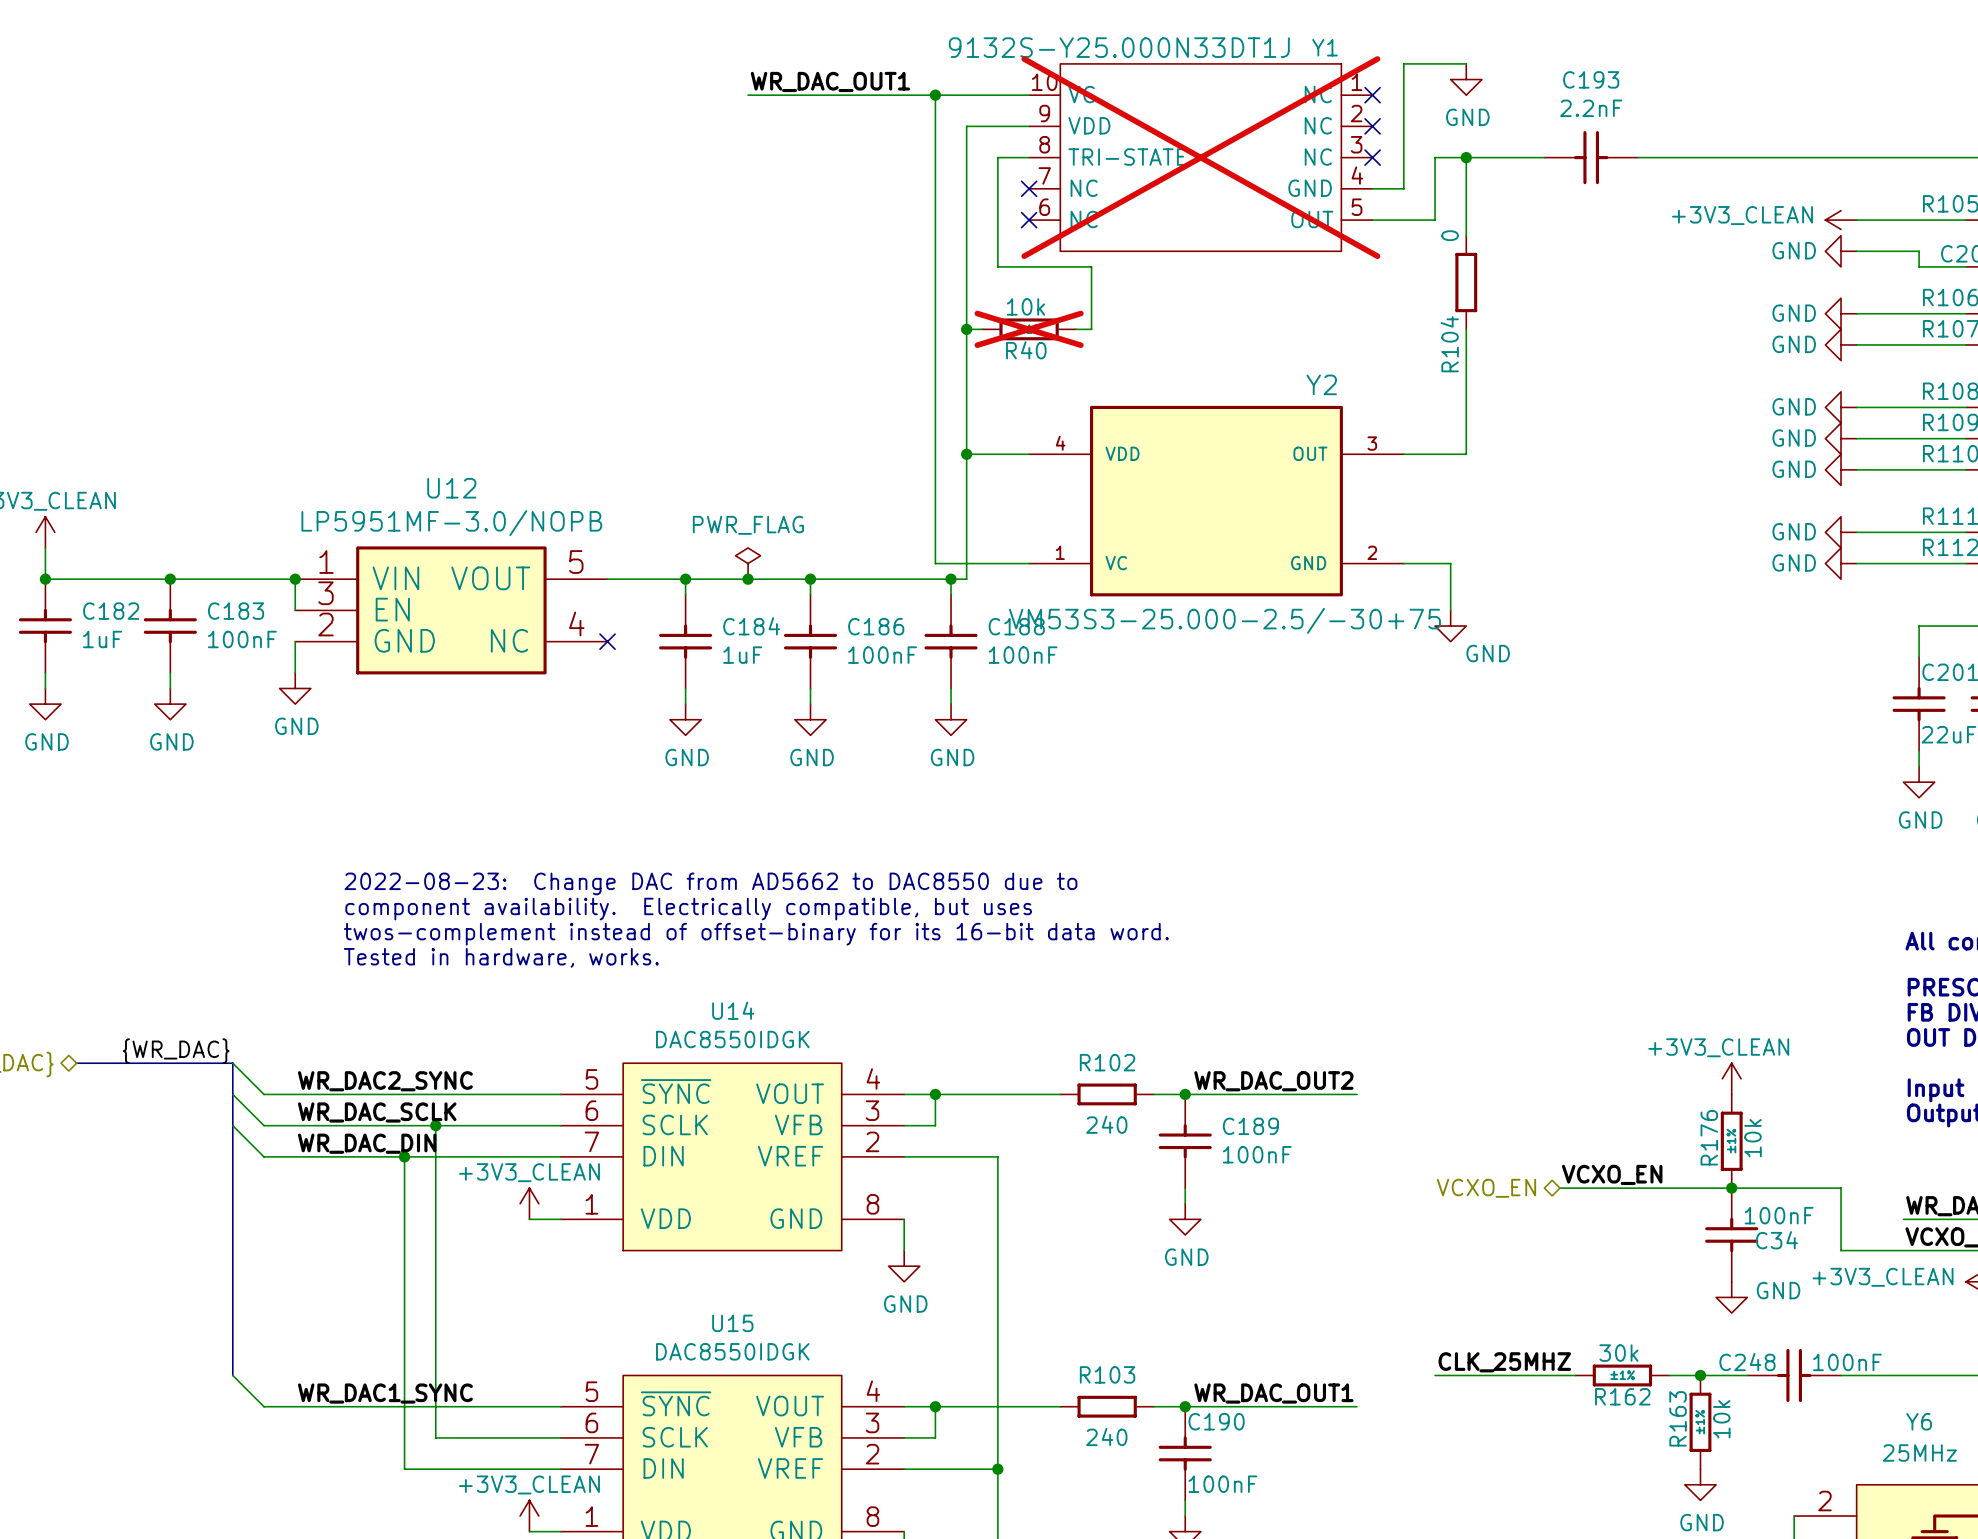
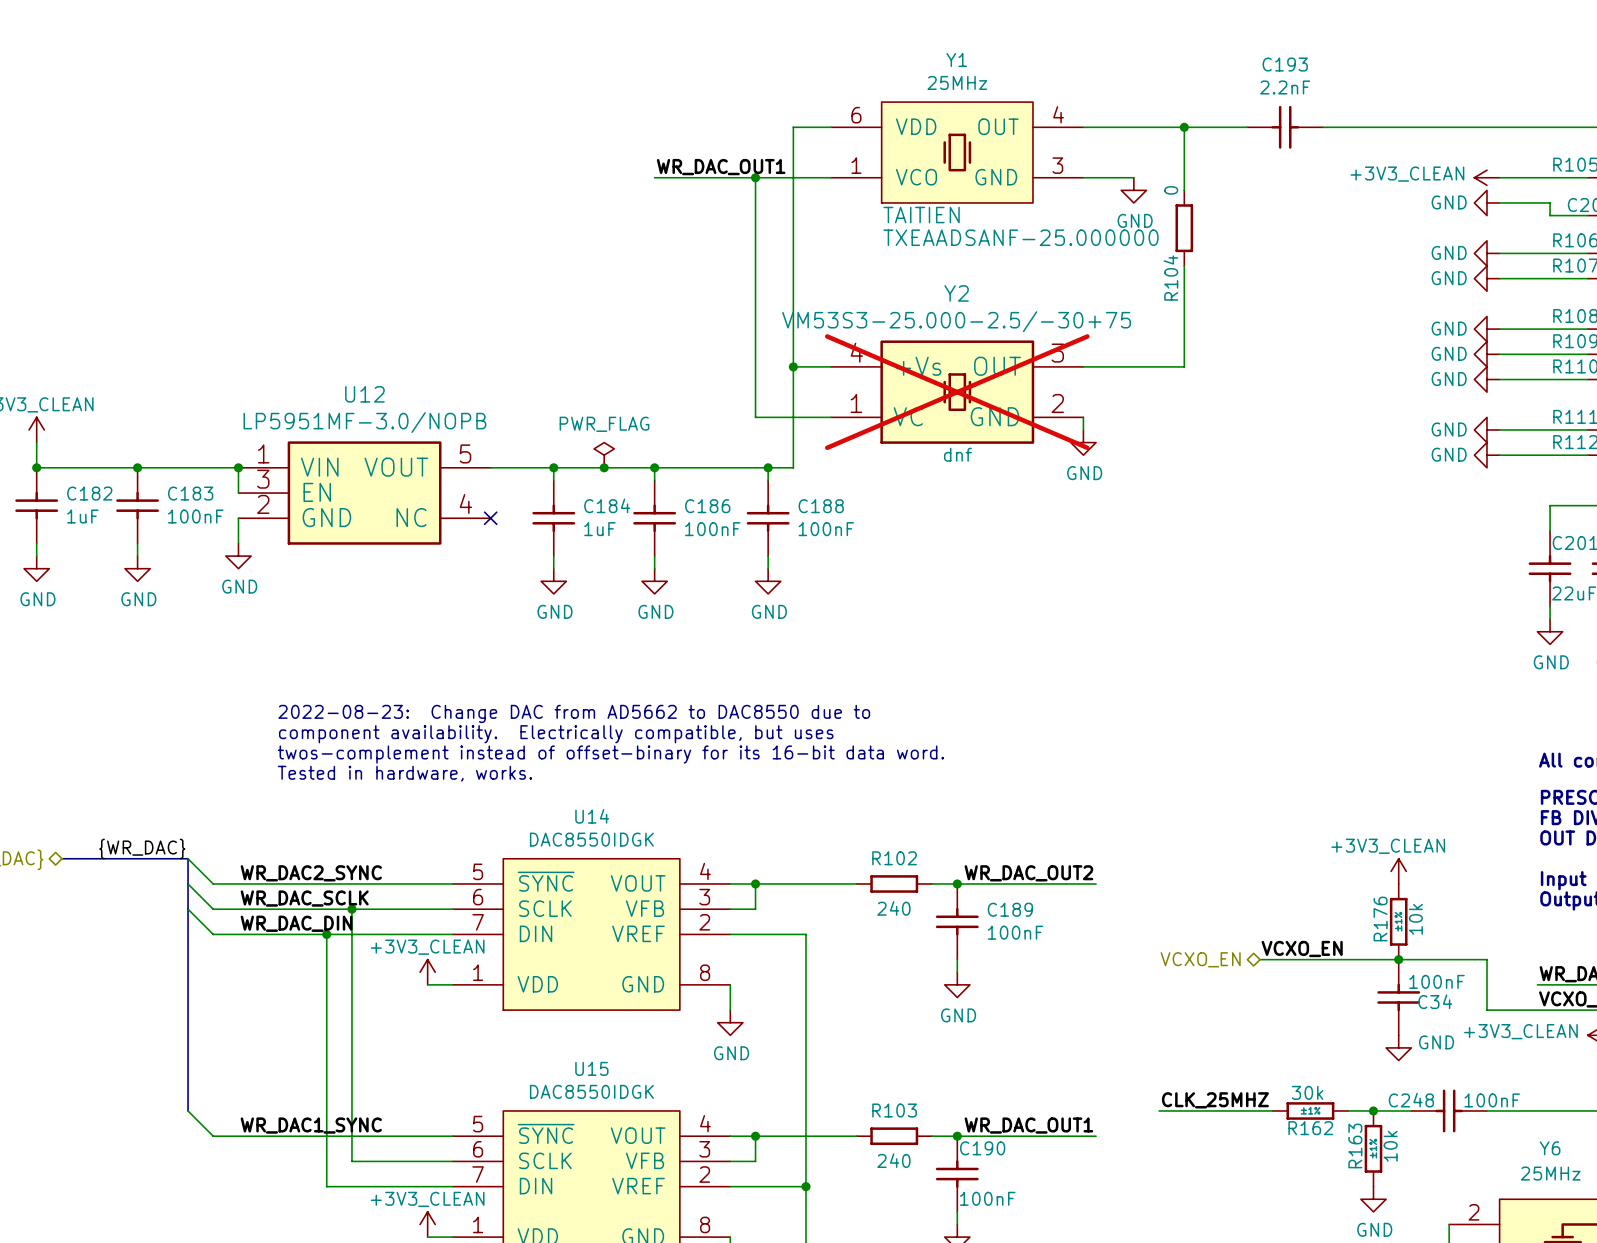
Y1 value: 9132S-Y25.000N33DT1J (1119, 47) -> none
Y1 name position: Y1 (1325, 47) -> Y1 (956, 59)
Y1 symbol: [1029, 63, 1373, 252] -> [831, 102, 1084, 203]
wire: (1466, 63) (1403, 63) (1403, 188) (1372, 188) -> none
power symbol position: GND (1466, 79) -> GND (1133, 190)
label position: WR_DAC_OUT1 (830, 81) -> WR_DAC_OUT1 (721, 167)
wire: (748, 95) (1029, 95) -> none
wire: (935, 95) (935, 220) -> none
junction: (935, 95) -> none
no-connect mark: (1372, 95) -> none
Y1 text: none -> 25MHz (957, 82)
wire: (1029, 126) (966, 126) (966, 579) -> (805, 127) (793, 127) (793, 467) (780, 467)
no-connect mark: (1372, 126) -> none
wire: (997, 157) (997, 266) (1091, 266) (1091, 329) (1075, 329) -> none
Y1 do-not-place cross: (1200, 157) -> none
no-connect mark: (1372, 157) -> none
wire: (1435, 157) (1435, 220) (1403, 220) -> (1159, 127) (1083, 127)
no-connect mark: (1029, 188) -> none
wire: none -> (654, 177) (831, 177)
junction: none -> (755, 177)
no-connect mark: (1029, 220) -> none
Y1 text: none -> TAITIEN (921, 215)
Y1 text: none -> TXEAADSANF-25.000000 (1021, 237)
wire: (966, 329) (982, 329) -> none
junction: (966, 329) -> none
R40: (1029, 329) -> none
Y2 name position: Y2 (1321, 384) -> Y2 (956, 293)
Y2 symbol: [1029, 405, 1404, 597] -> [831, 340, 1084, 444]
wire: (966, 454) (982, 454) -> none
junction position: (966, 454) -> (793, 366)
Y2 do-not-place cross: none -> (957, 392)
wire: (935, 516) (935, 563) (1029, 563) -> (755, 417) (831, 417)
Y2 text: none -> dnf (957, 454)
wire: (1403, 563) (1450, 563) (1450, 610) -> none
Y2 value position: VM53S3-25.000-2.5/-30+75 (1224, 620) -> VM53S3-25.000-2.5/-30+75 (956, 321)
power symbol position: GND (1450, 626) -> GND (1083, 442)
power symbol text position: GND (1488, 653) -> GND (1084, 473)

